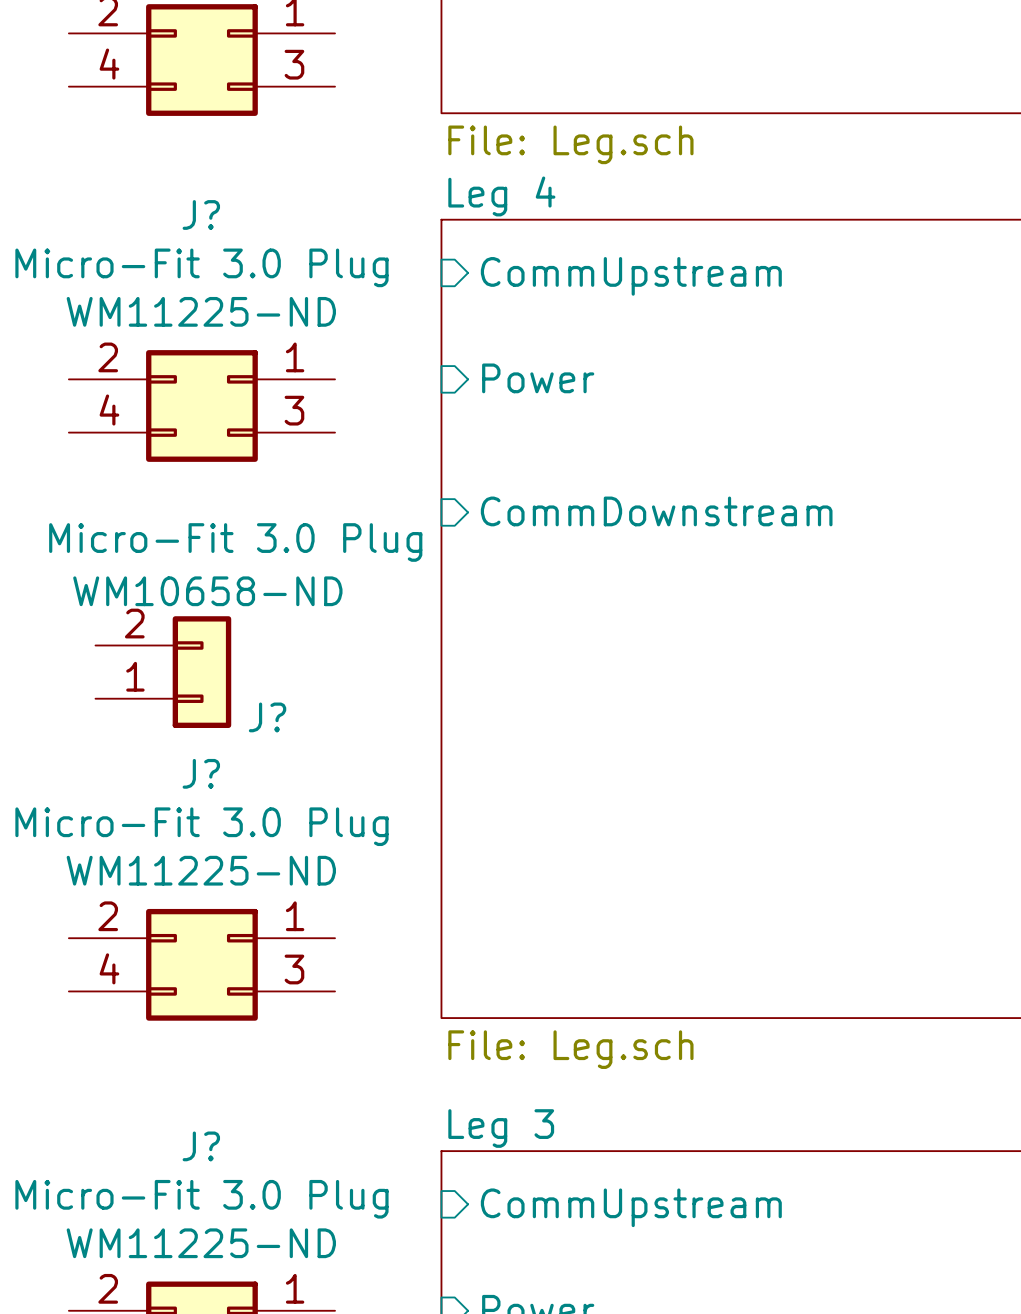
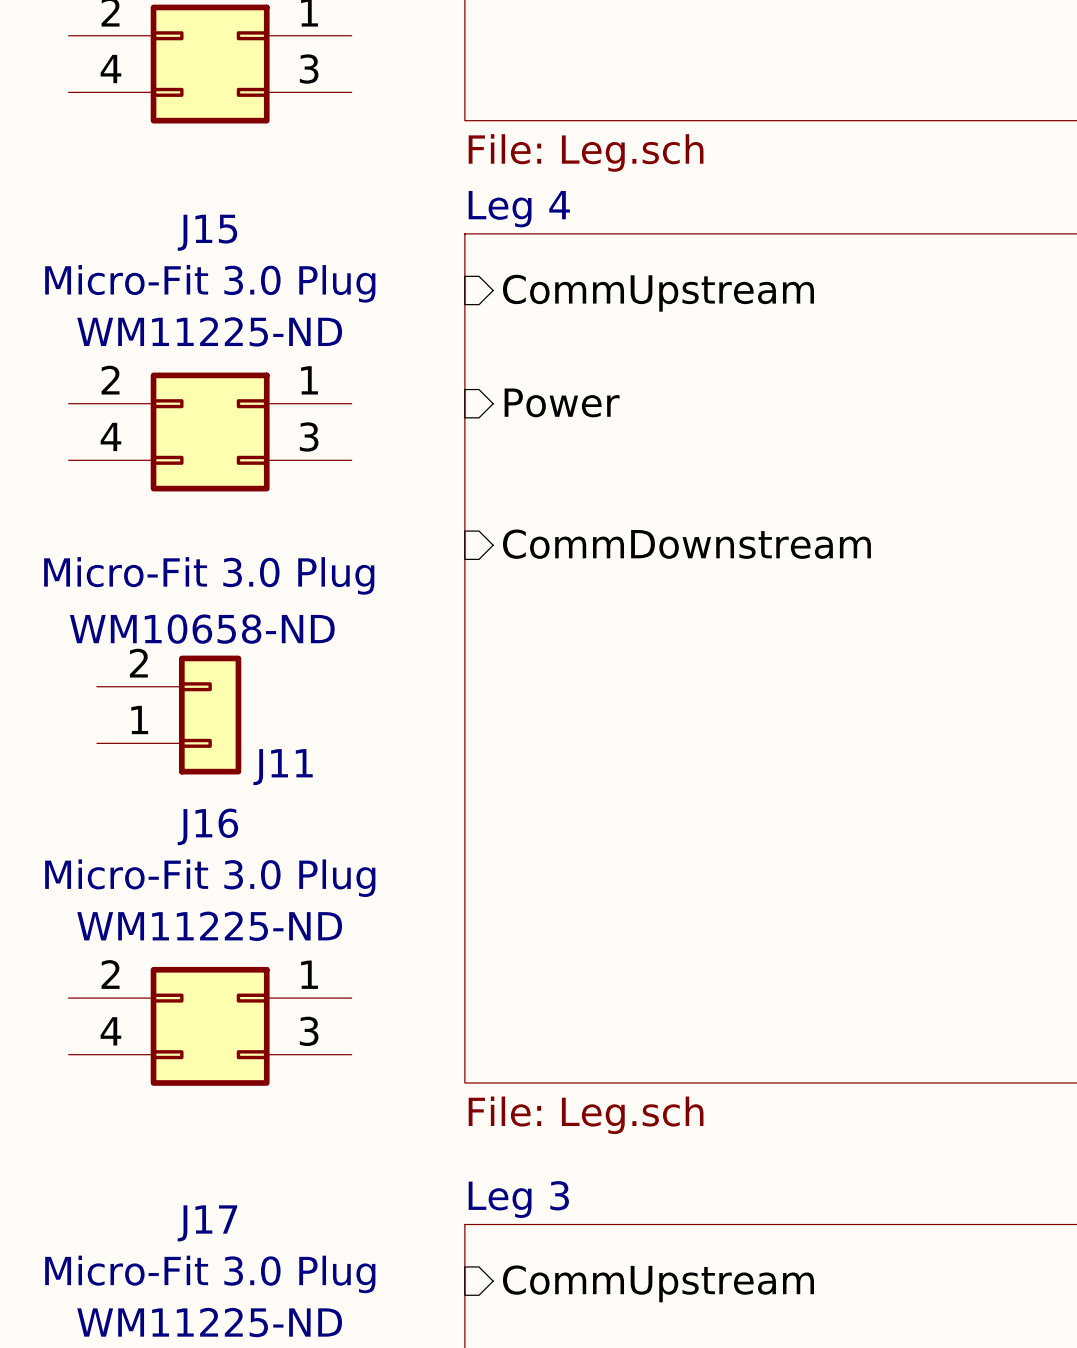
J? name: J? (201, 214) -> J15 (207, 232)
J? name: J? (267, 717) -> J11 (283, 767)
J? name: J? (201, 773) -> J16 (207, 826)
J? name: J? (201, 1146) -> J17 (207, 1223)

